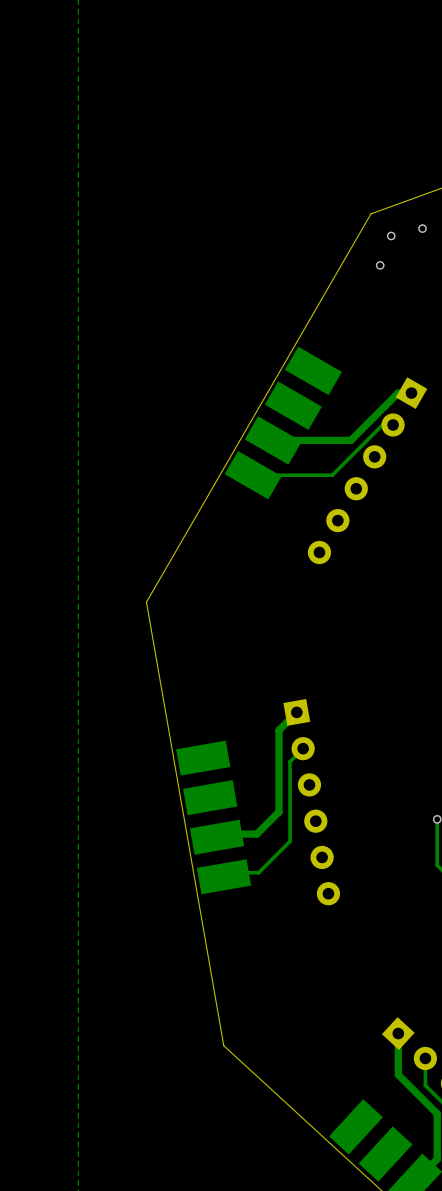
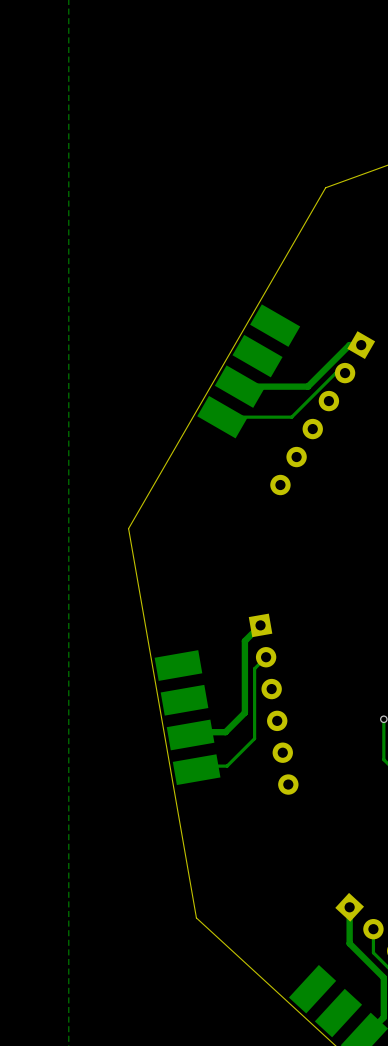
via: (422, 228) -> none
via: (391, 235) -> none
via: (380, 265) -> none

